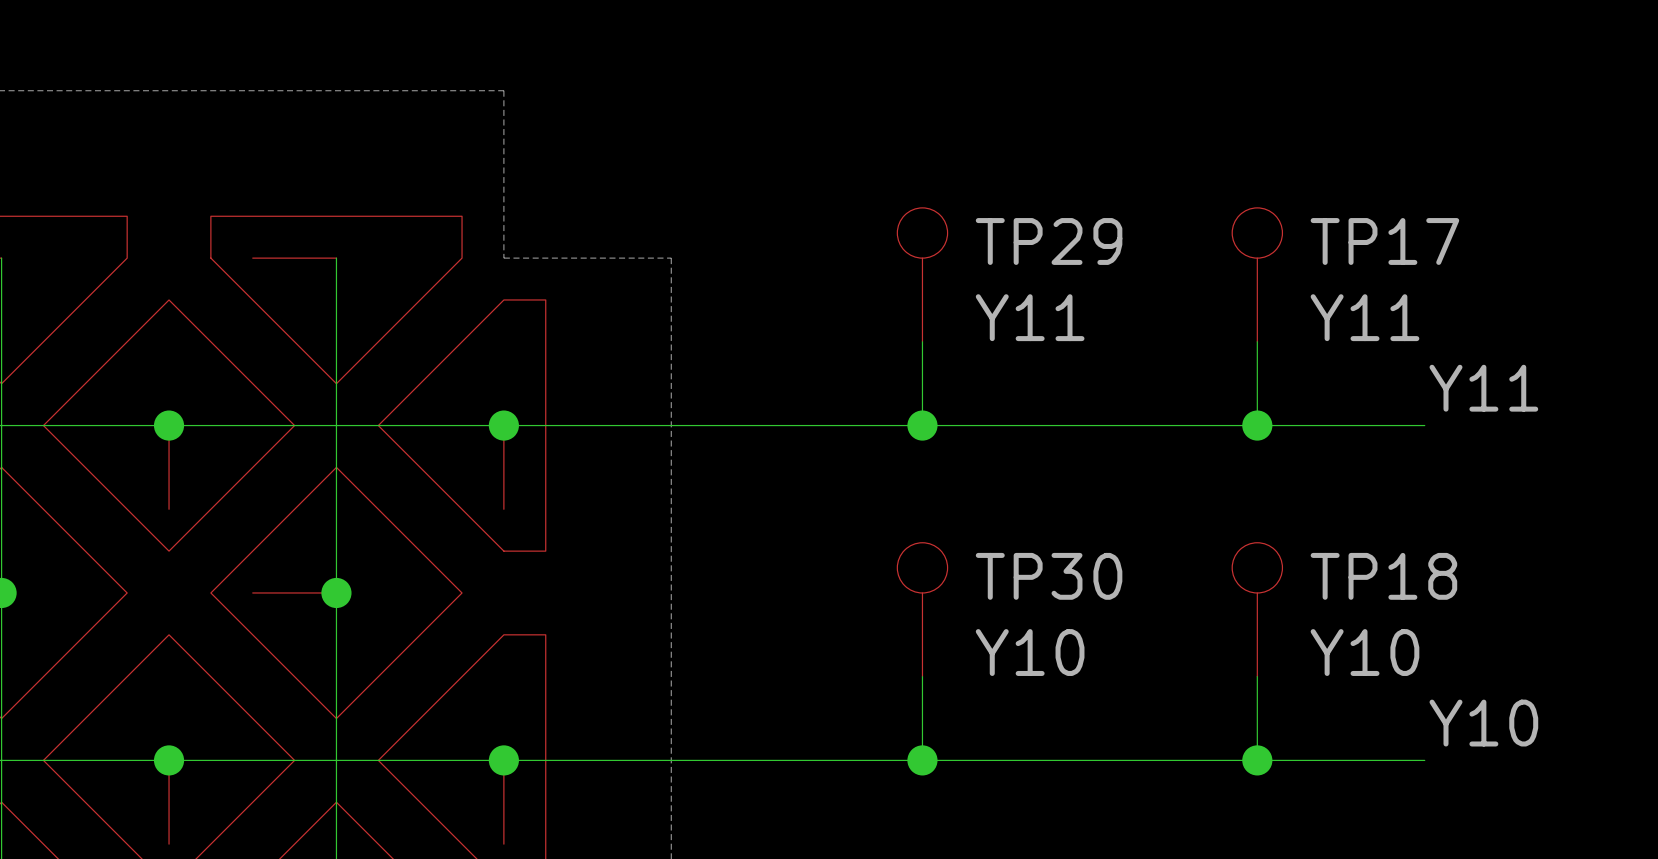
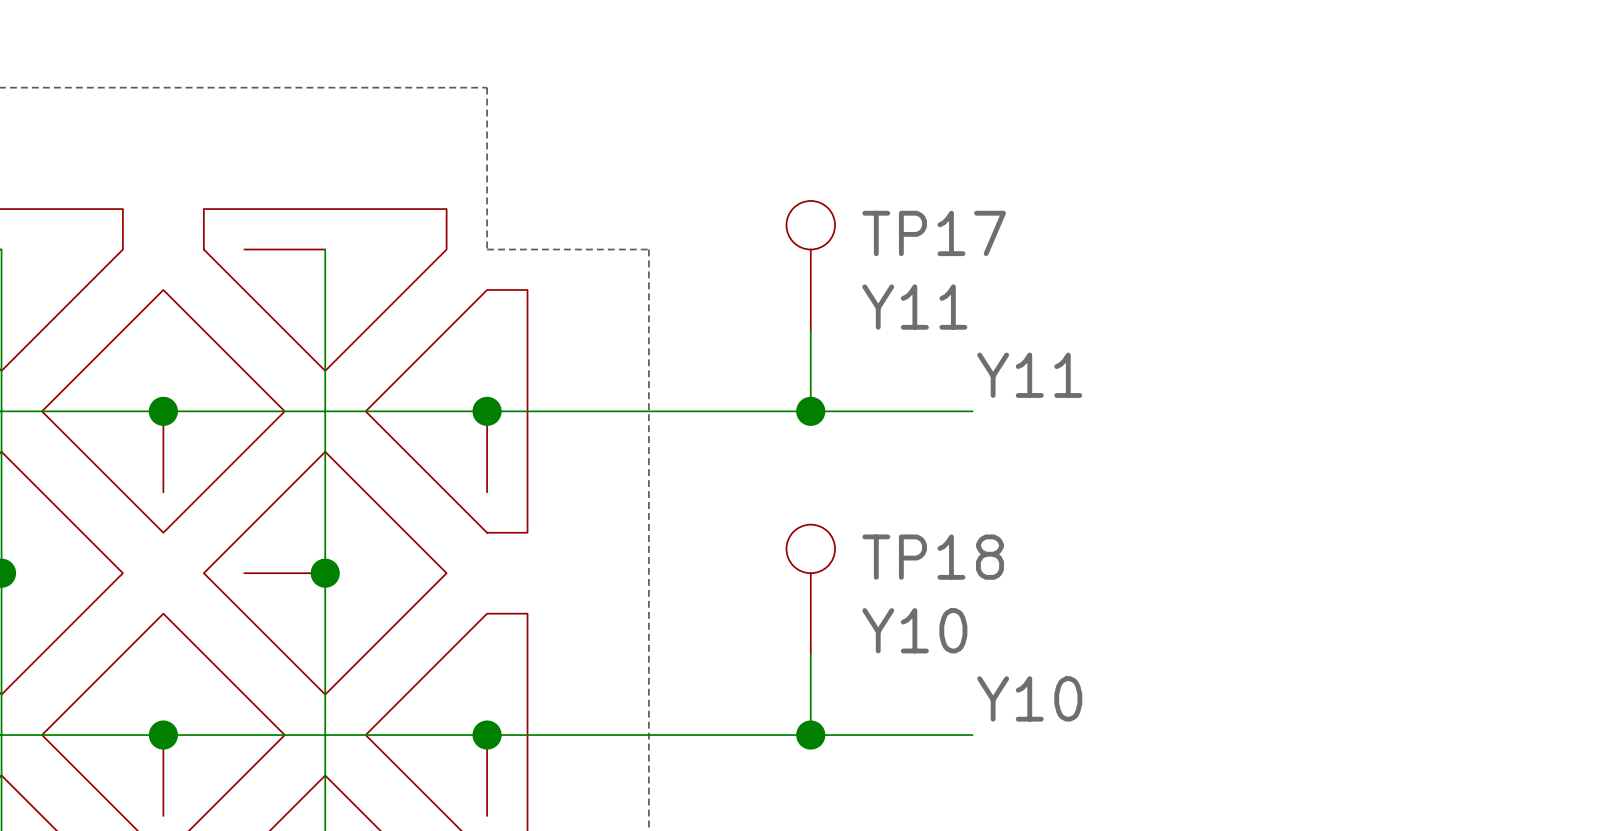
TP29: Y11 (922, 274) -> none
TP17 position: (1257, 274) -> (810, 265)
wire: (922, 341) (922, 425) -> (810, 330) (810, 411)
wire: (1257, 341) (1257, 425) -> none
label position: Y11 (1483, 388) -> Y11 (1029, 375)
junction position: (922, 425) -> (810, 411)
wire: (1006, 425) (1424, 425) -> none
junction: (1257, 425) -> none
TP30: Y10 (922, 609) -> none
TP18 position: (1257, 609) -> (810, 589)
wire: (922, 676) (922, 760) -> (810, 654) (810, 735)
wire: (1257, 676) (1257, 760) -> none
label position: Y10 (1483, 723) -> Y10 (1029, 698)
junction position: (922, 760) -> (810, 735)
wire: (1006, 760) (1424, 760) -> none
junction: (1257, 760) -> none

